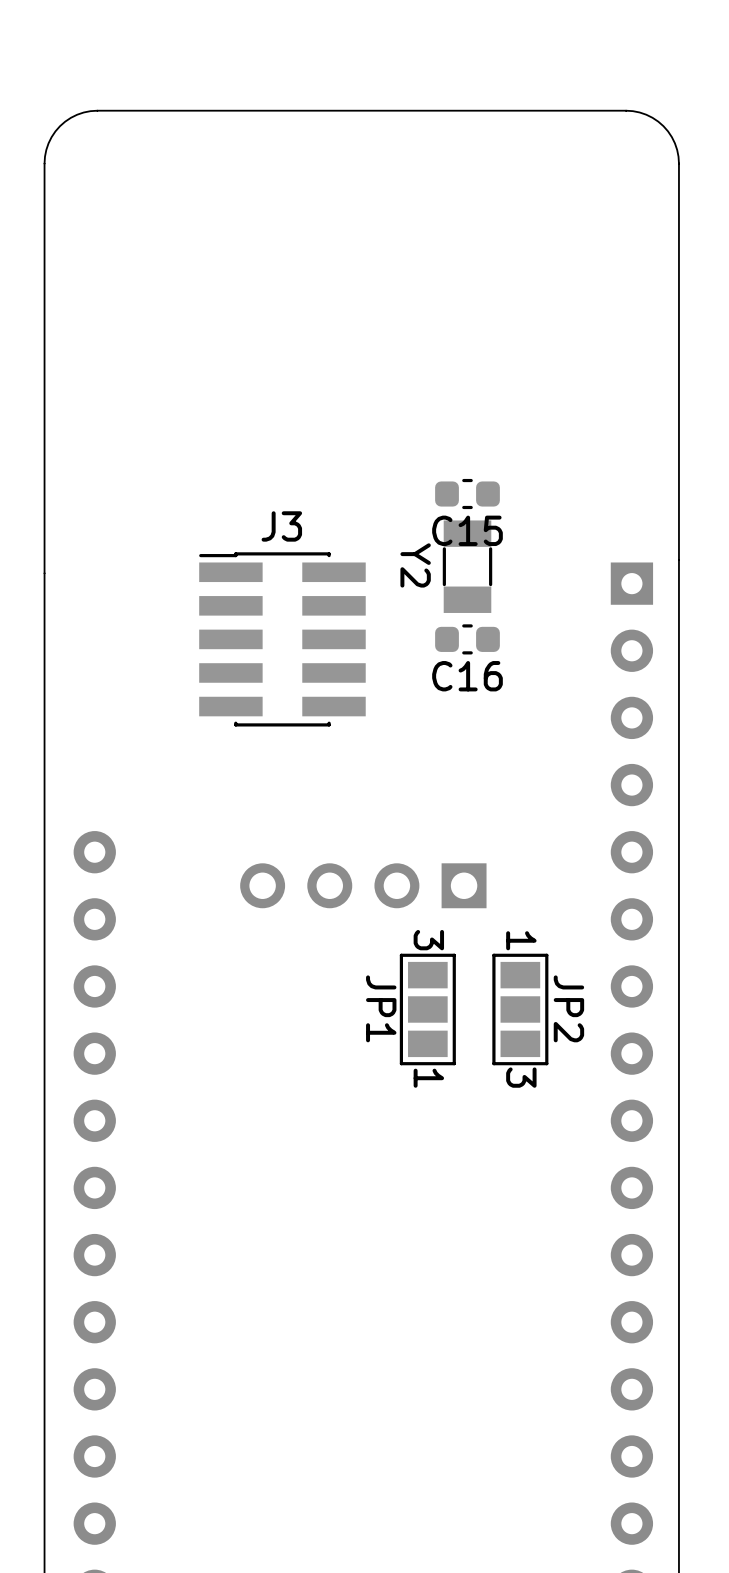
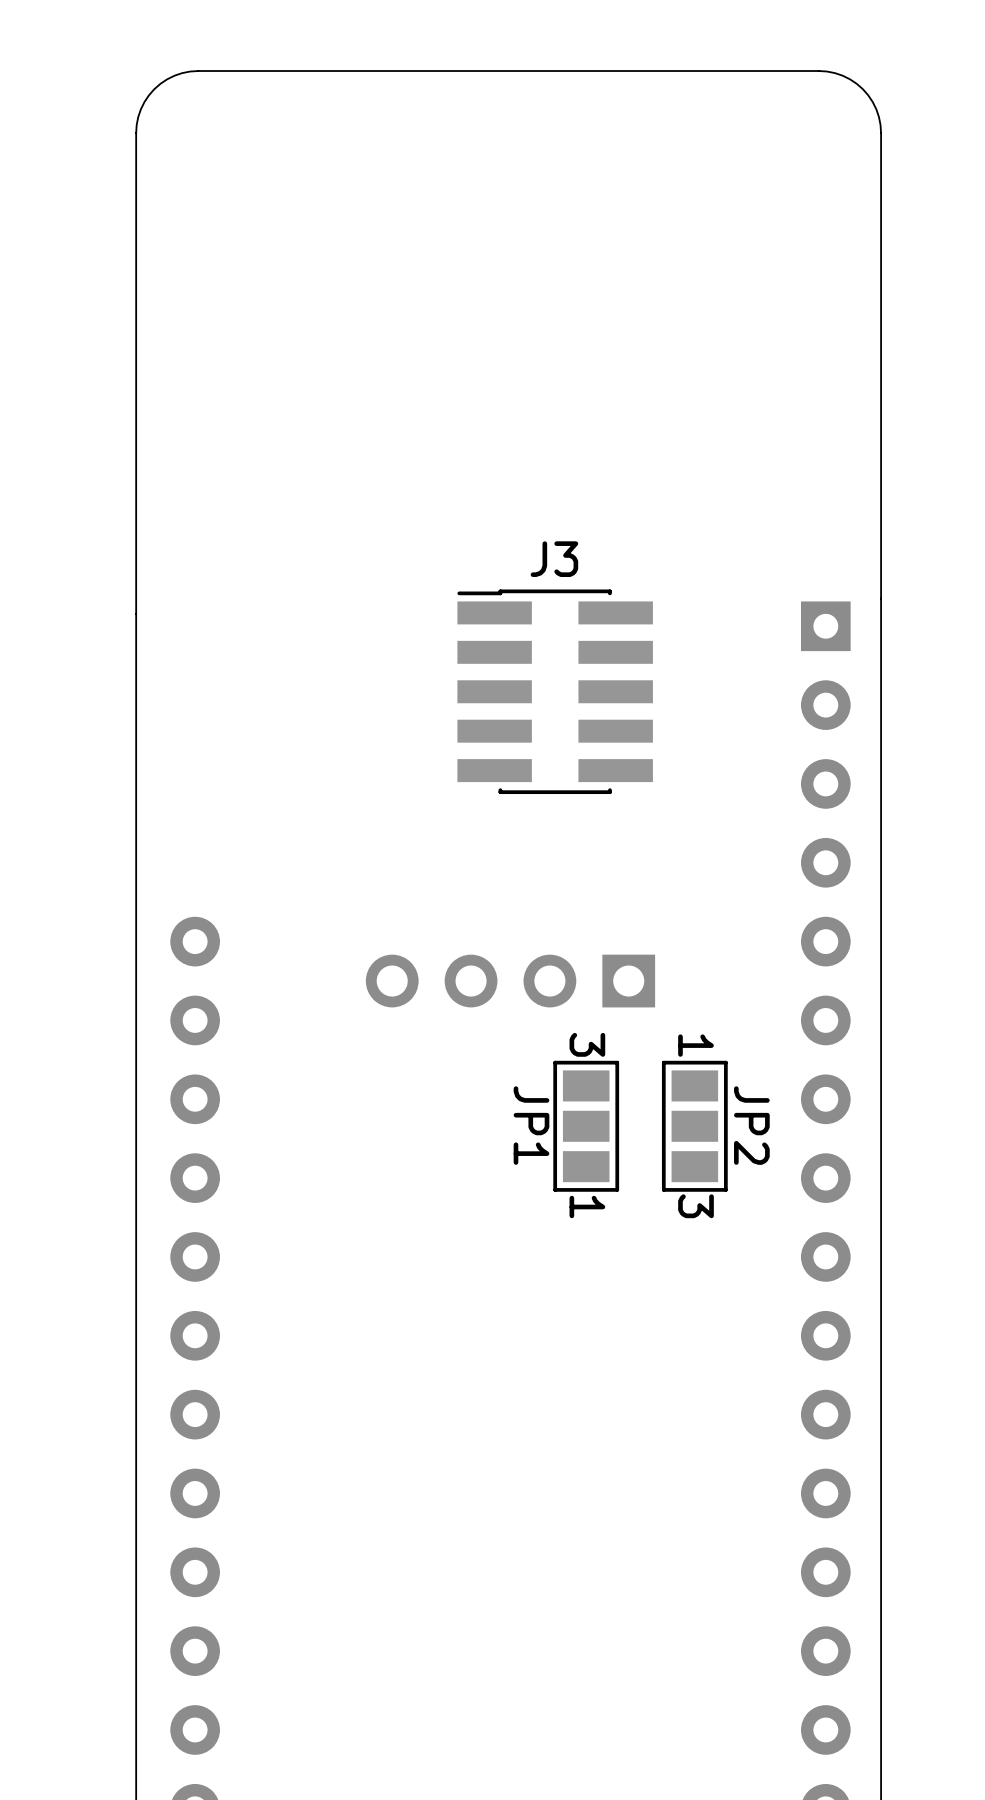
C15: (467, 494) -> none
Y2: (467, 566) -> none
J3 position: (282, 639) -> (555, 691)
C16: (467, 639) -> none

